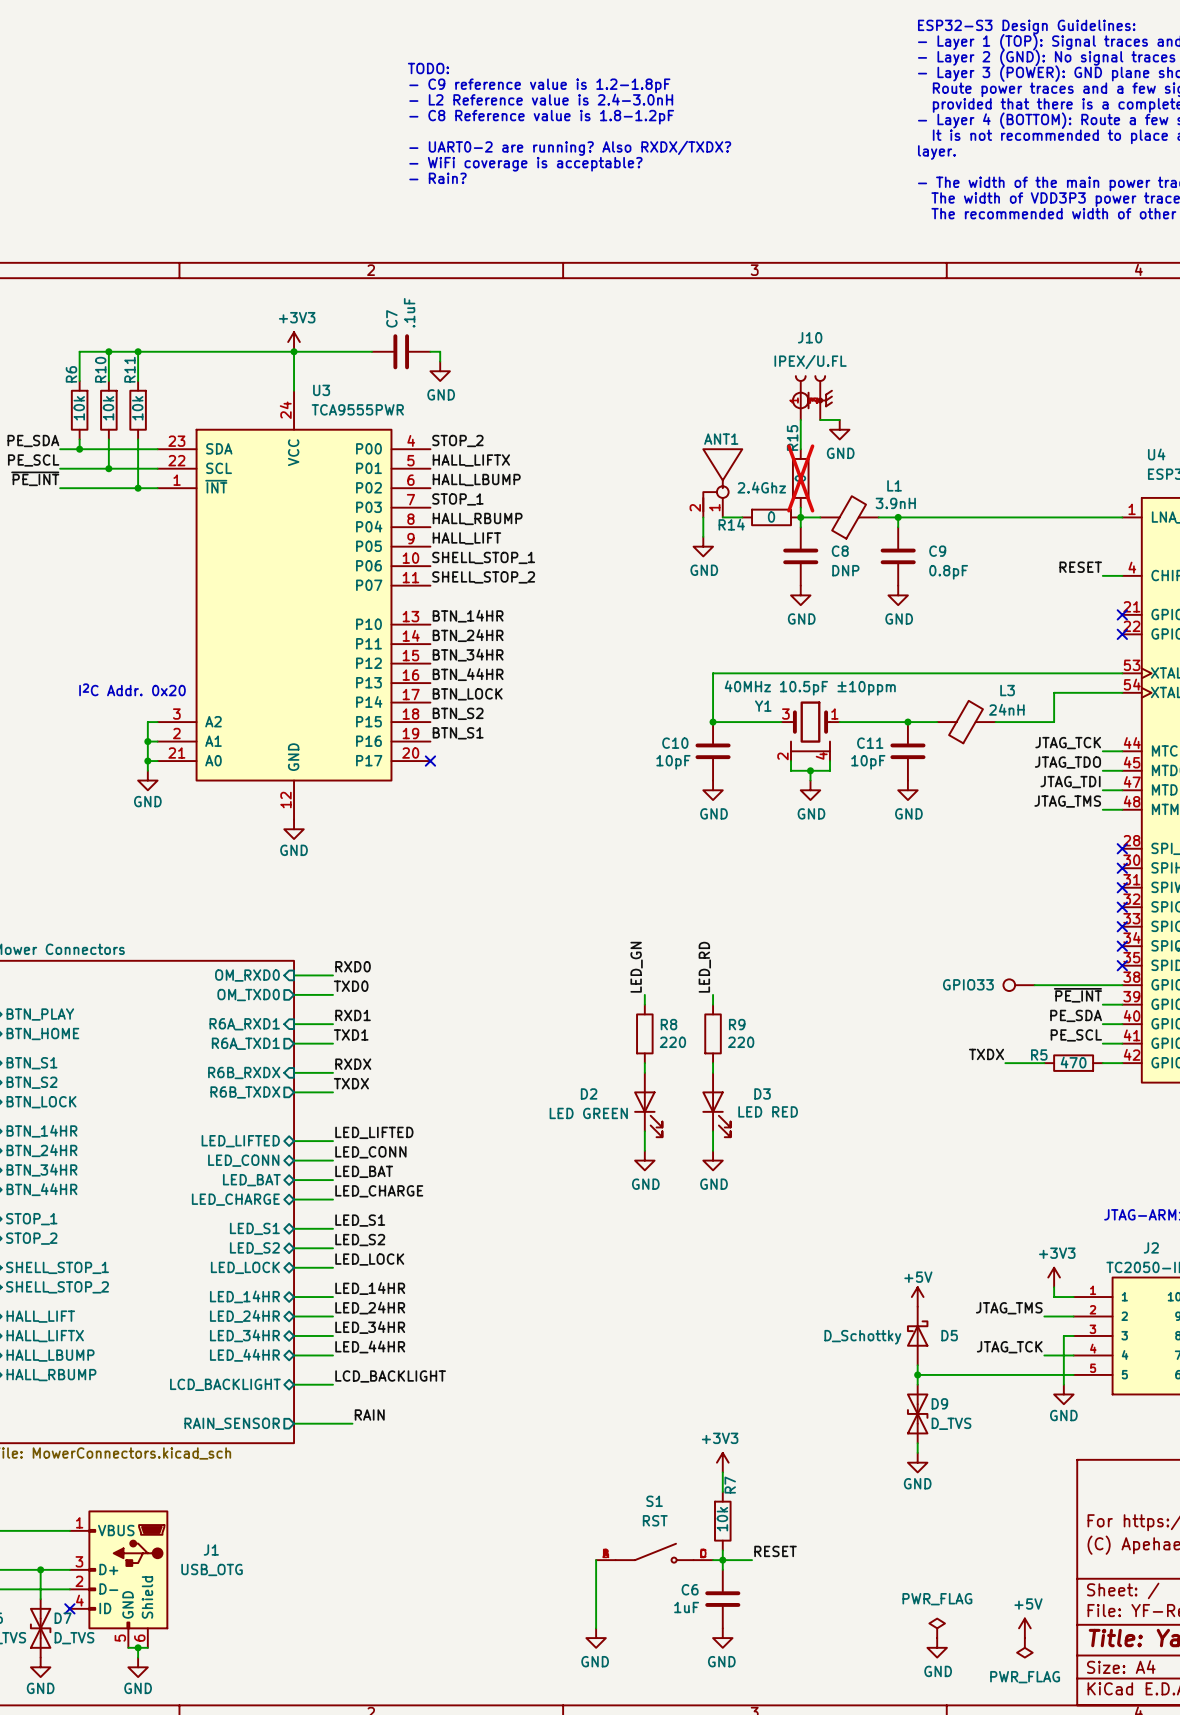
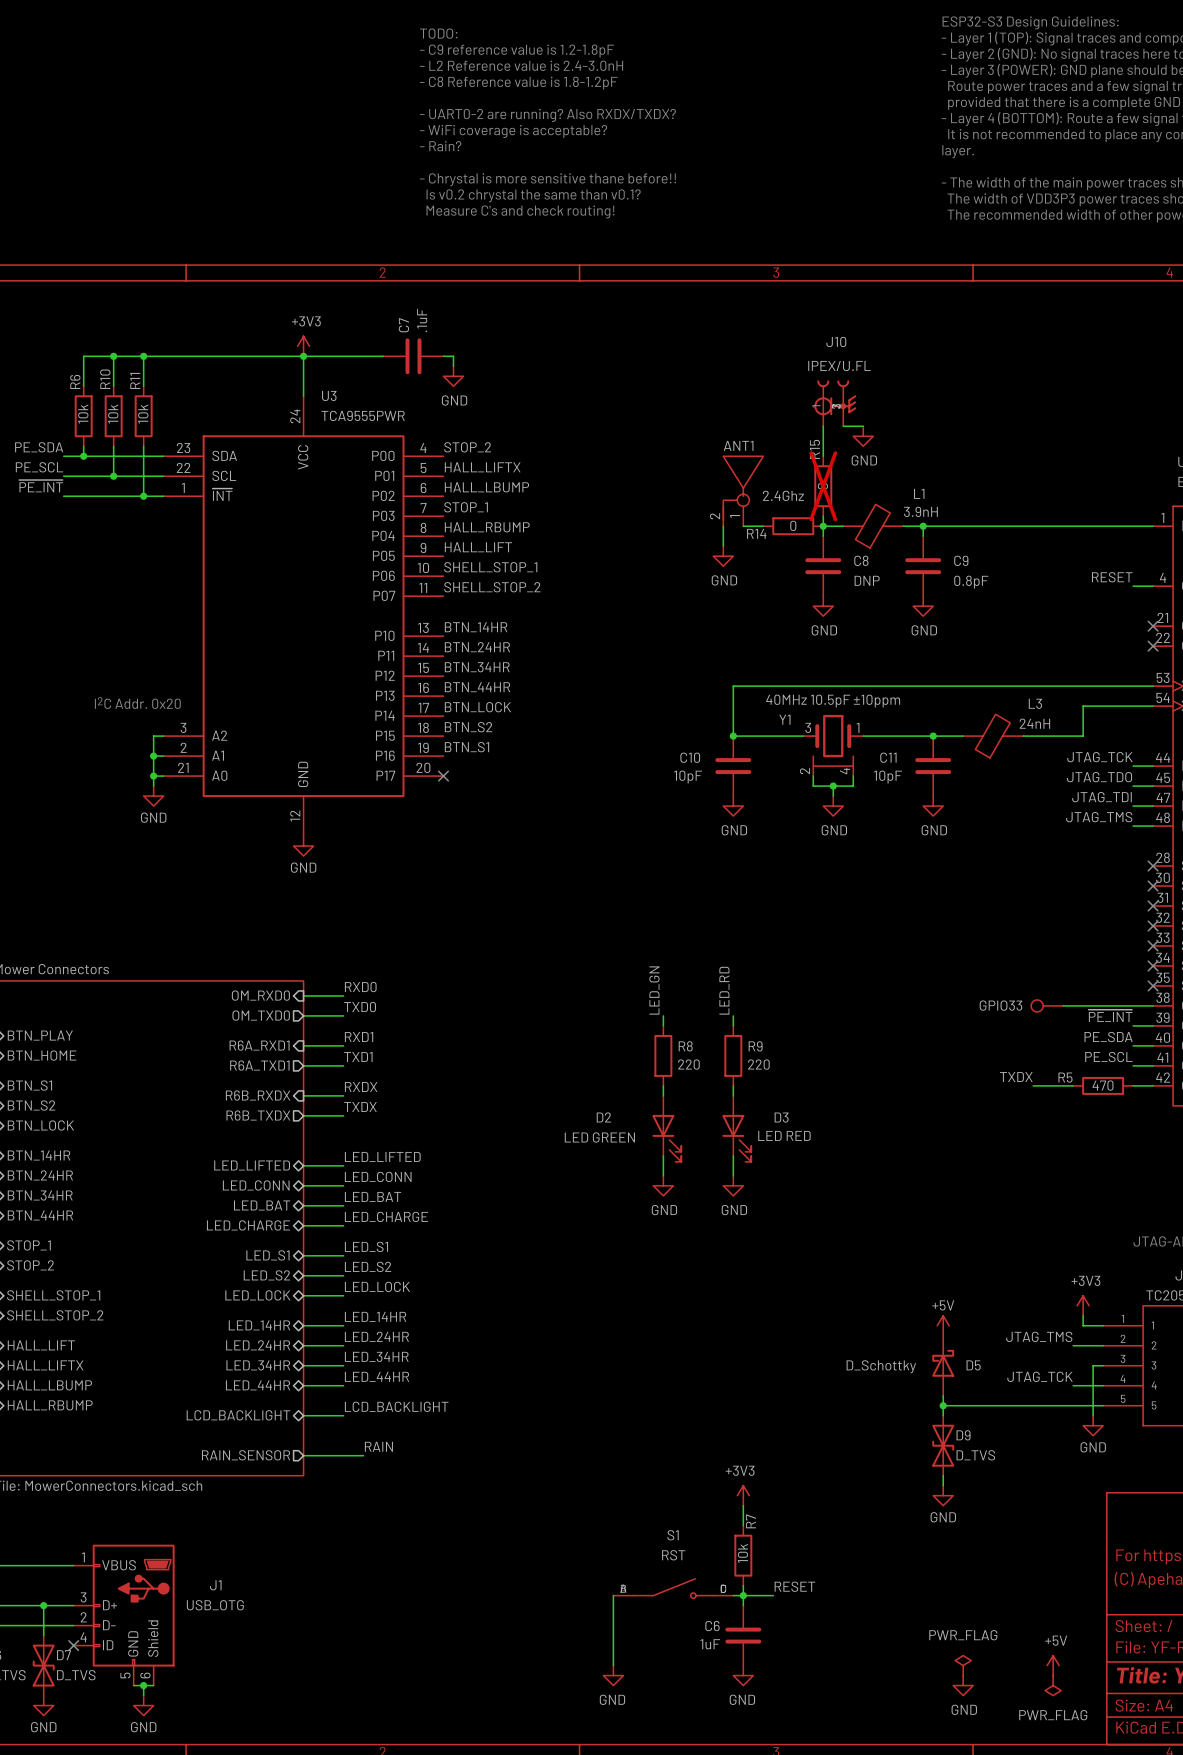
text: none -> TODO: (438, 33)
text: none -> - C9 reference value is 1.2-1.8pF (517, 51)
text: TODO: (428, 68) -> - L2 Reference value is 2.4-3.0nH (521, 65)
text: - C9 reference value is 1.2-1.8pF (539, 85) -> - C8 Reference value is 1.8-1.2pF (518, 83)
text: - L2 Reference value is 2.4-3.0nH (541, 99) -> none
text: - C8 Reference value is 1.8-1.2pF (541, 117) -> - UART0-2 are running? Also RXDX/TXDX? (547, 115)
text: - UART0-2 are running? Also RXDX/TXDX? (570, 148) -> - Rain? (440, 146)
text position: - WiFi coverage is acceptable? (525, 164) -> - WiFi coverage is acceptable? (513, 131)
text: - Rain? (437, 178) -> - Chrystal is more sensitive thane before!! (548, 179)
text: none -> Is v0.2 chrystal the same than v0.1? (533, 195)
text: none -> Measure C's and check routing! (520, 211)

